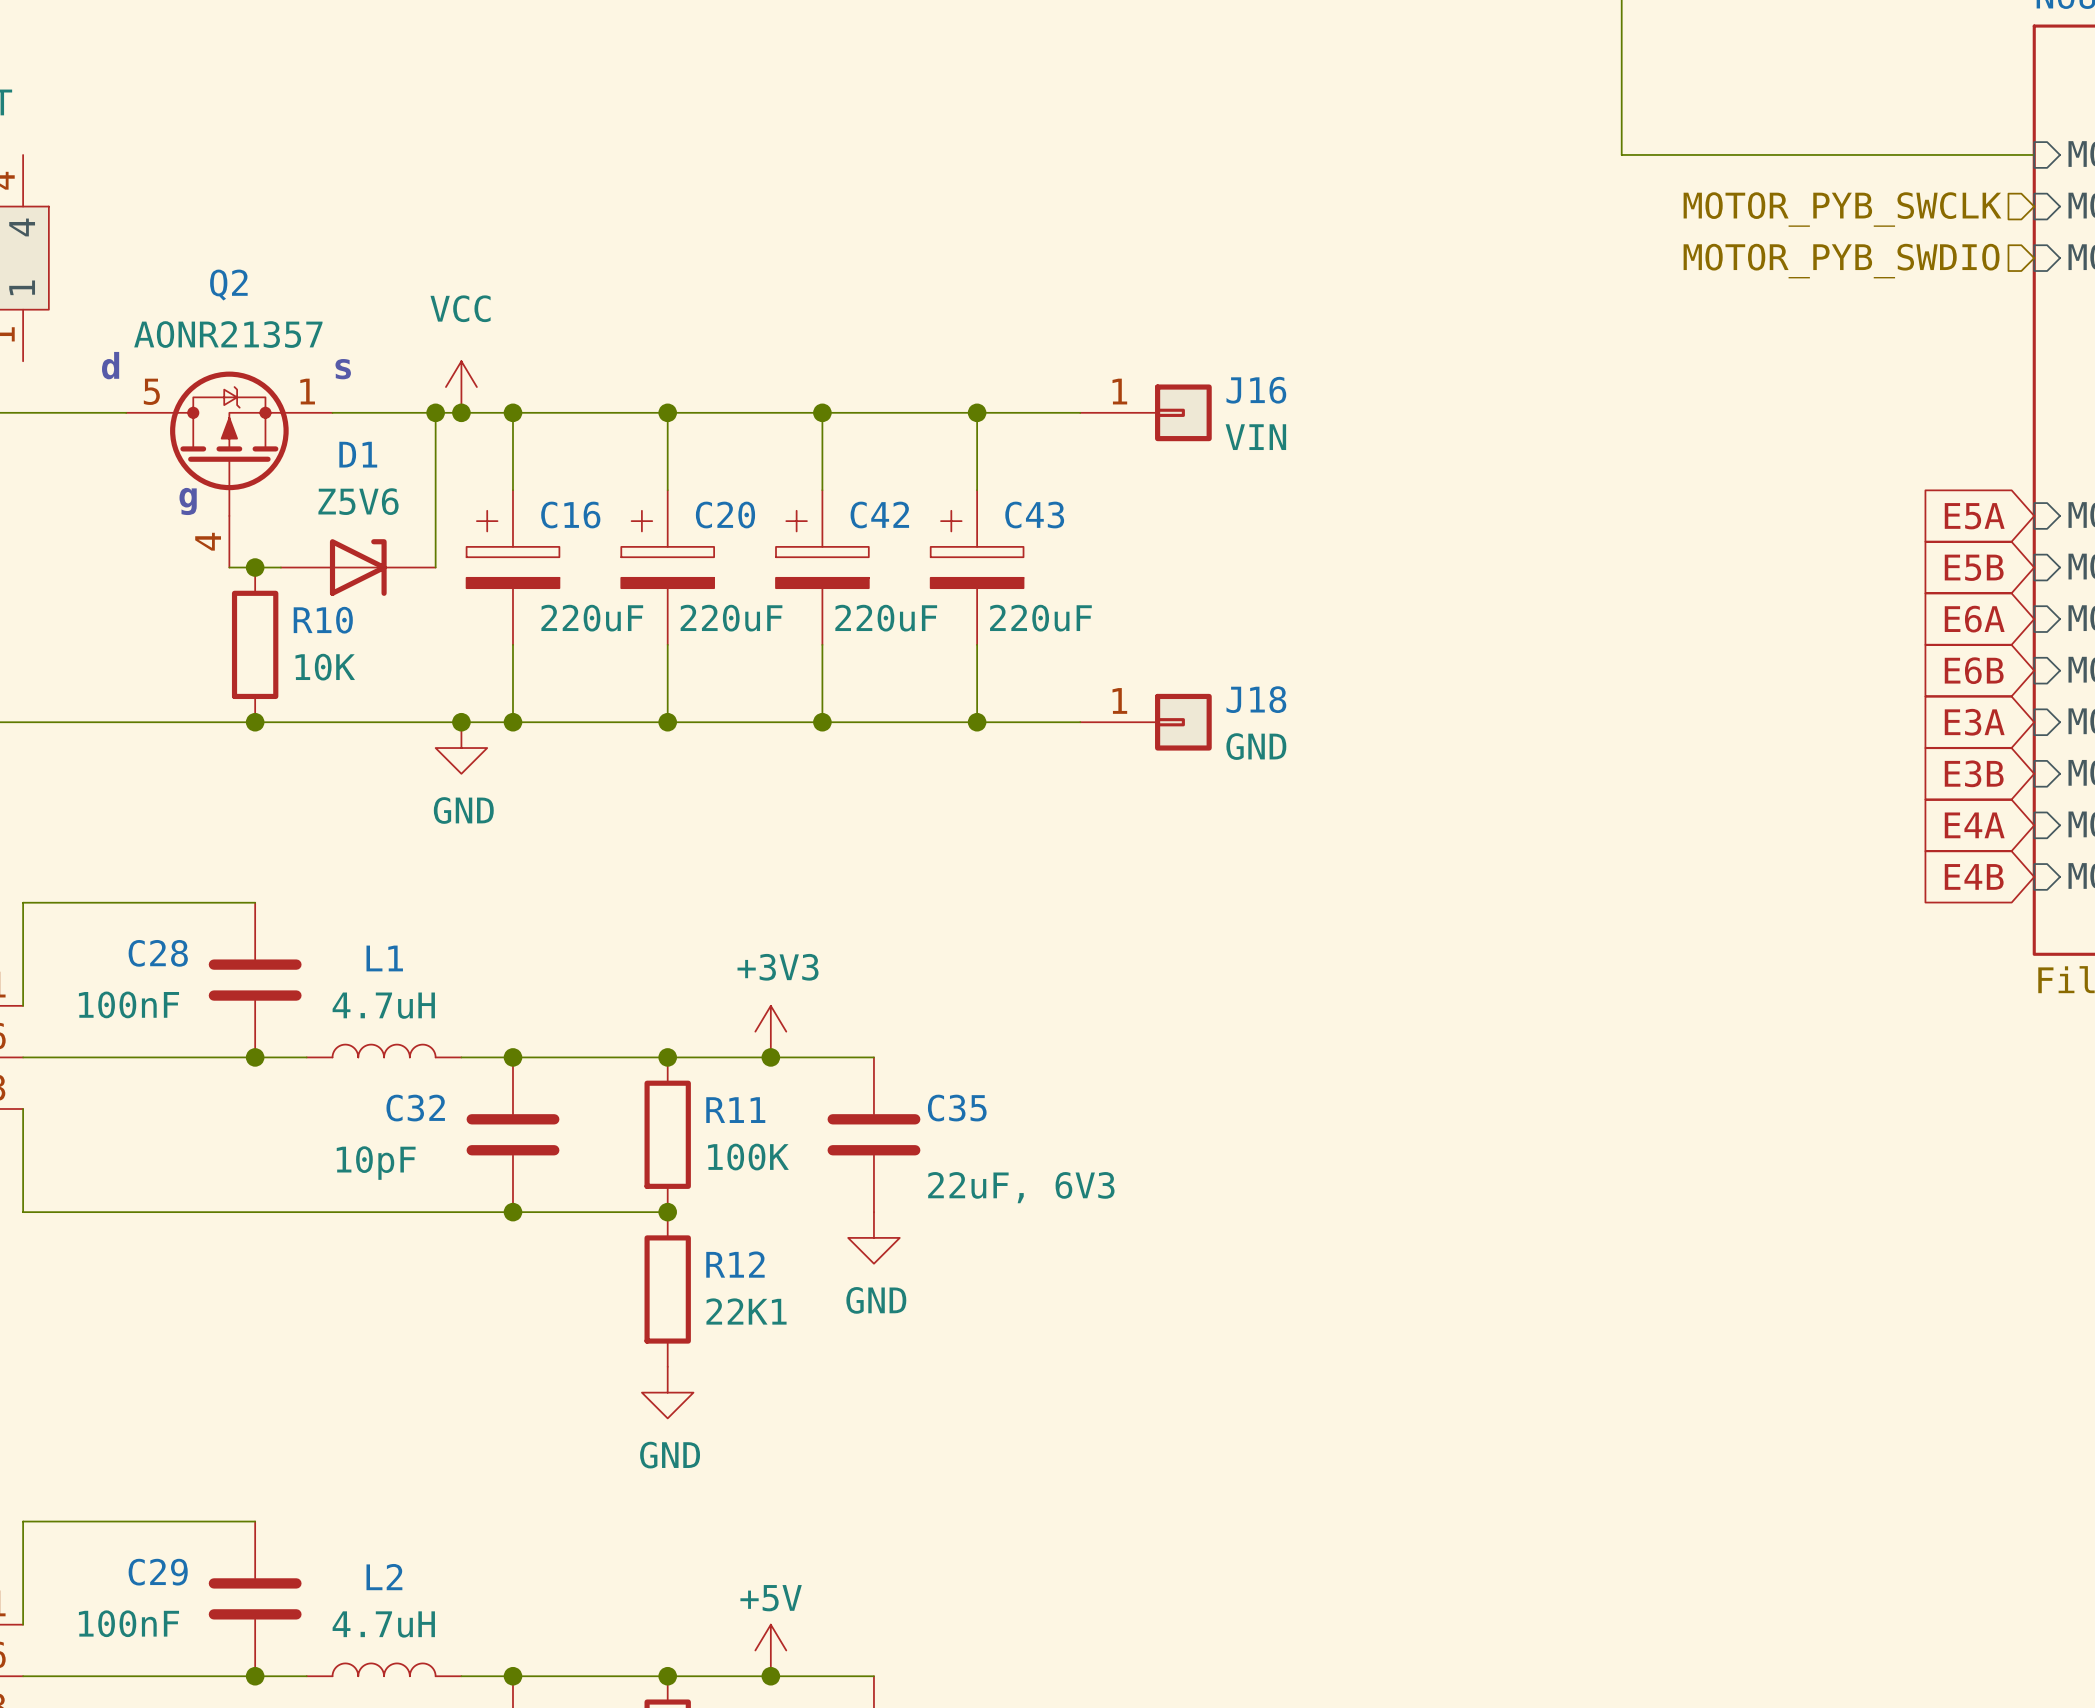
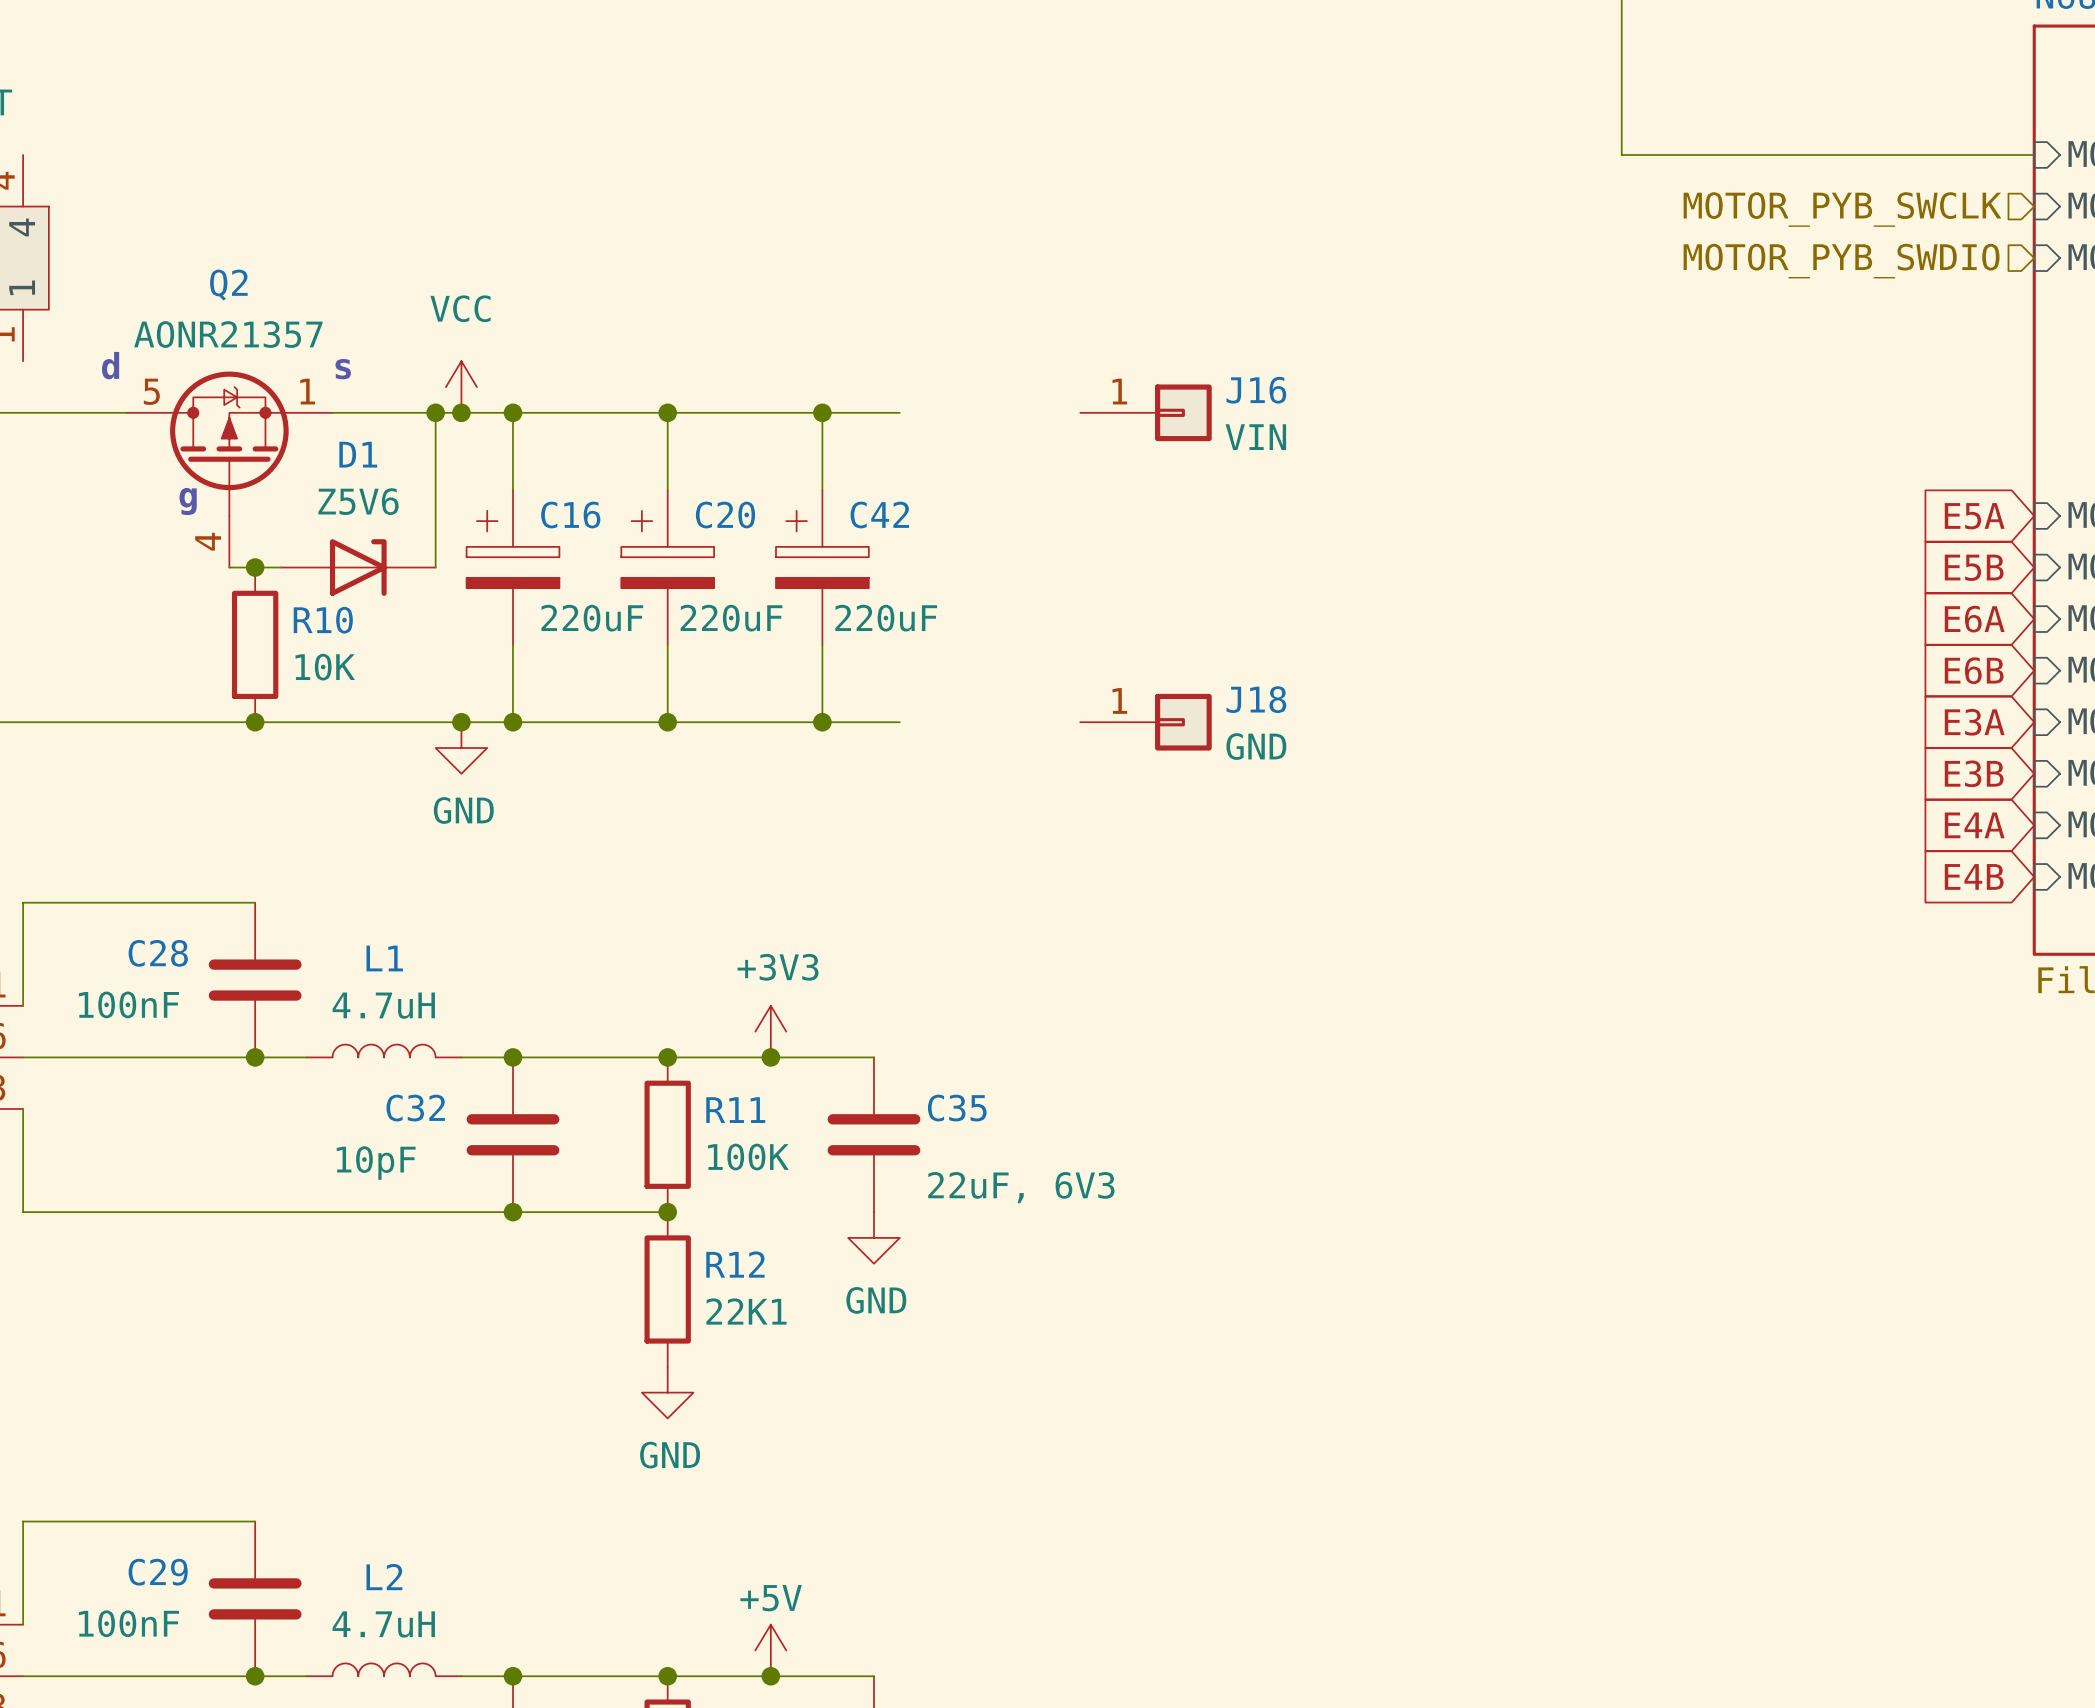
wire: (899, 412) (1080, 412) -> none
wire: (977, 412) (977, 490) -> none
junction: (977, 412) -> none
C43: 220uF (977, 567) -> none
wire: (977, 644) (977, 722) -> none
wire: (899, 722) (1080, 722) -> none
junction: (977, 722) -> none

